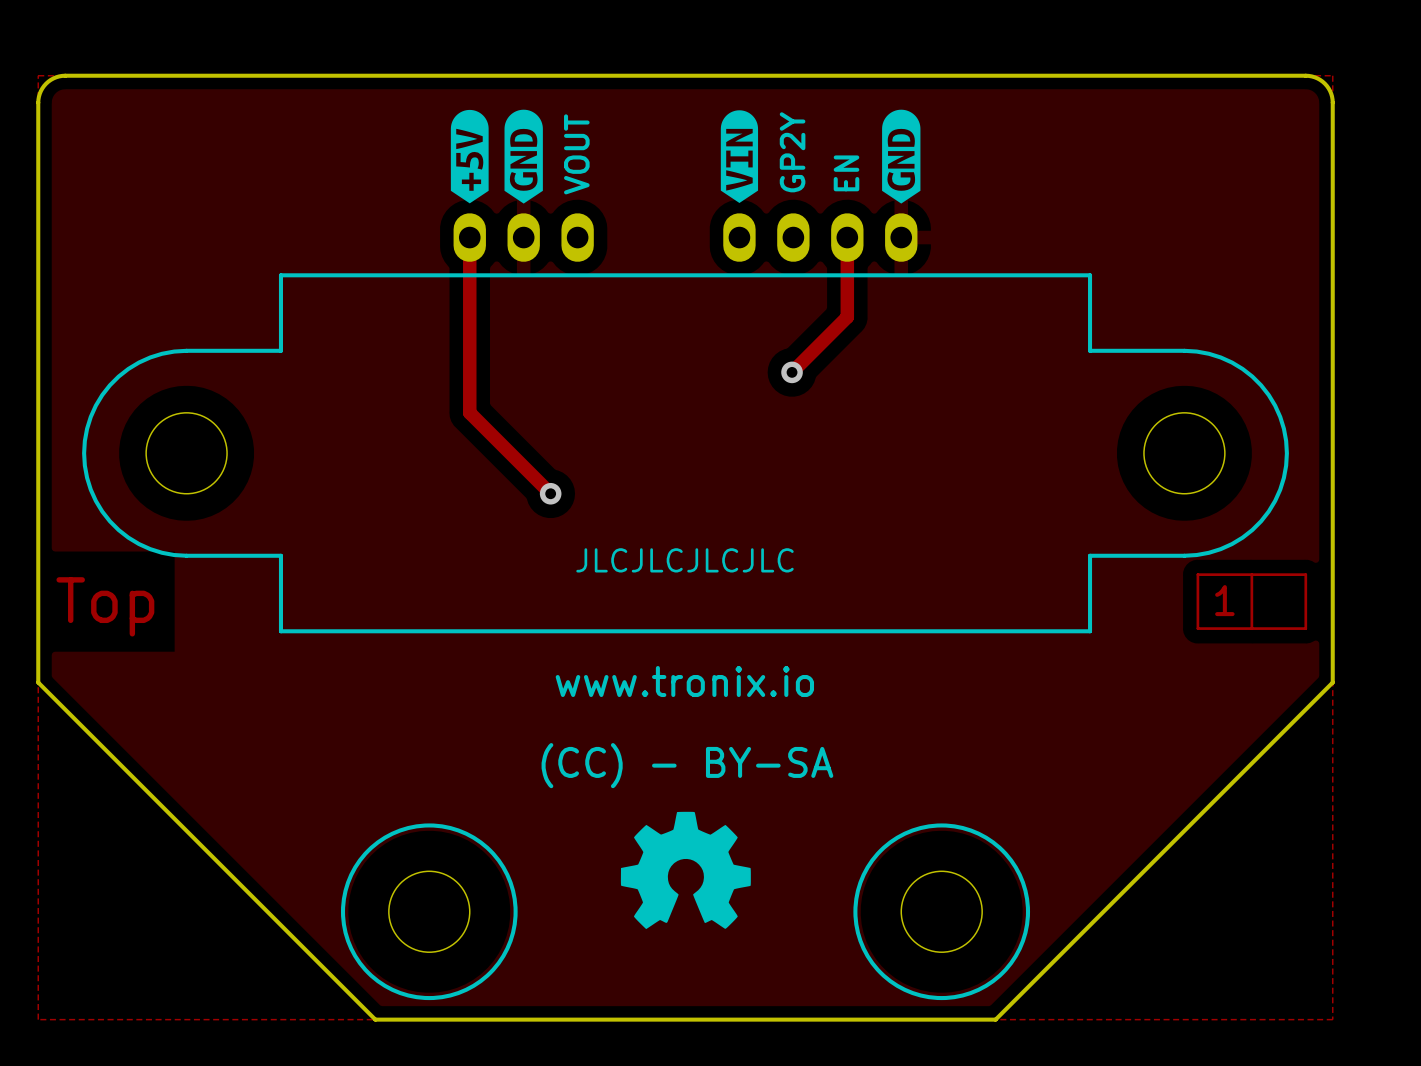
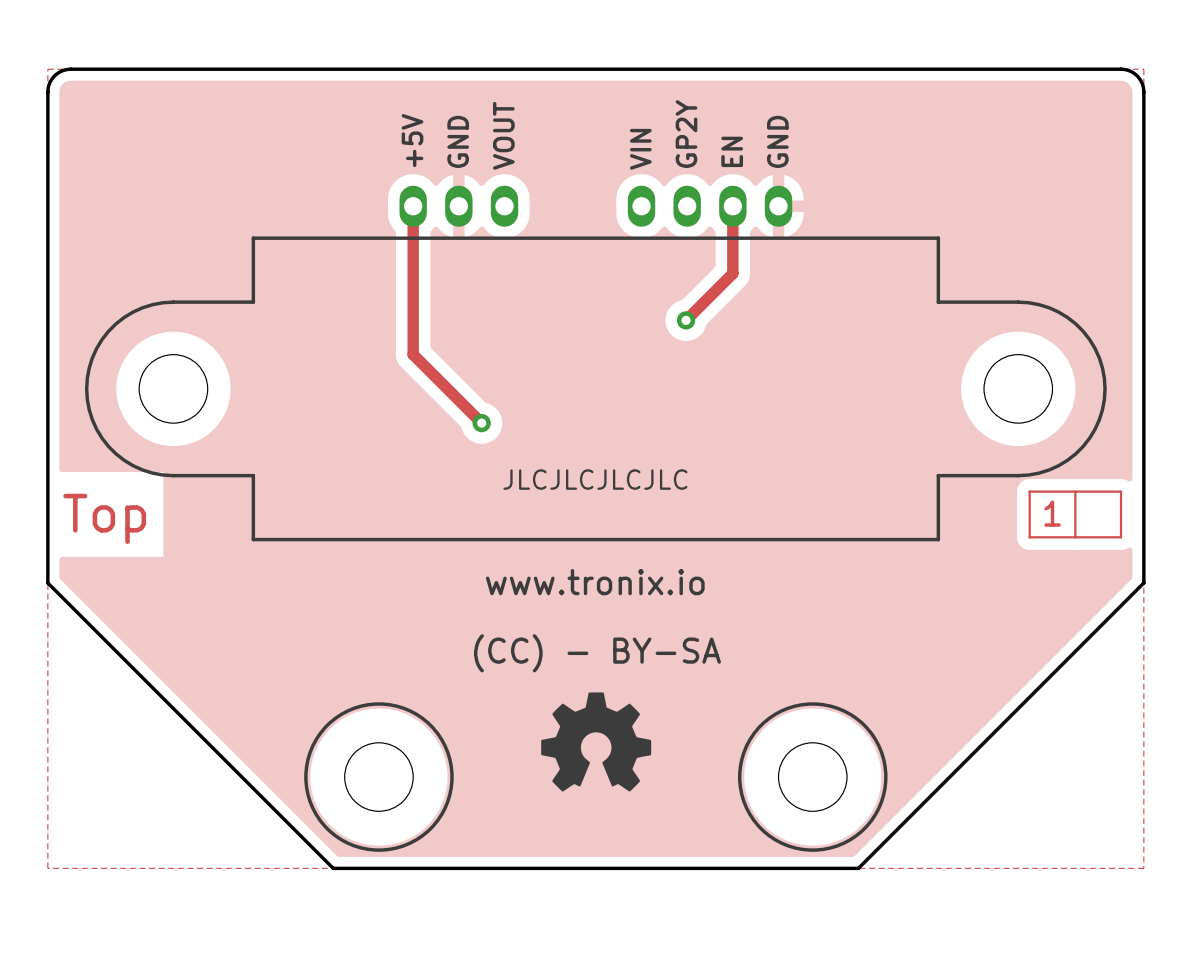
drawing: [450, 109, 543, 204] -> none
drawing: [882, 109, 921, 204] -> none
drawing: [720, 110, 759, 203] -> none
text: none -> +5V (412, 140)
text: none -> GND (458, 141)
text: none -> GND (777, 141)
text: none -> VIN (640, 149)

